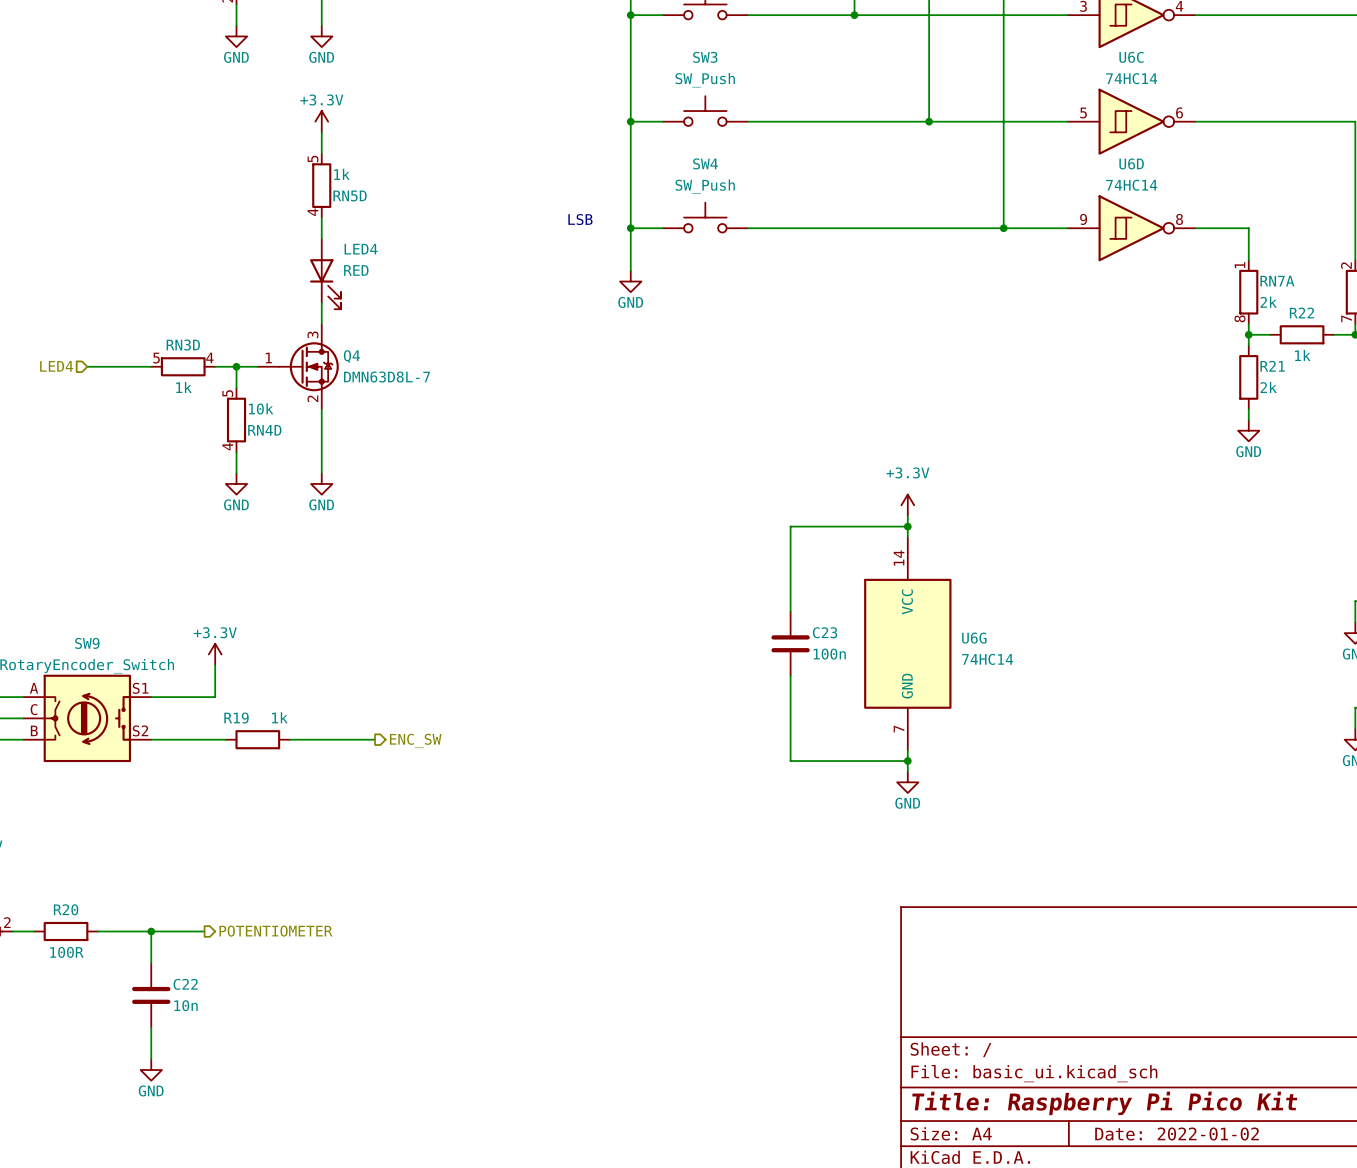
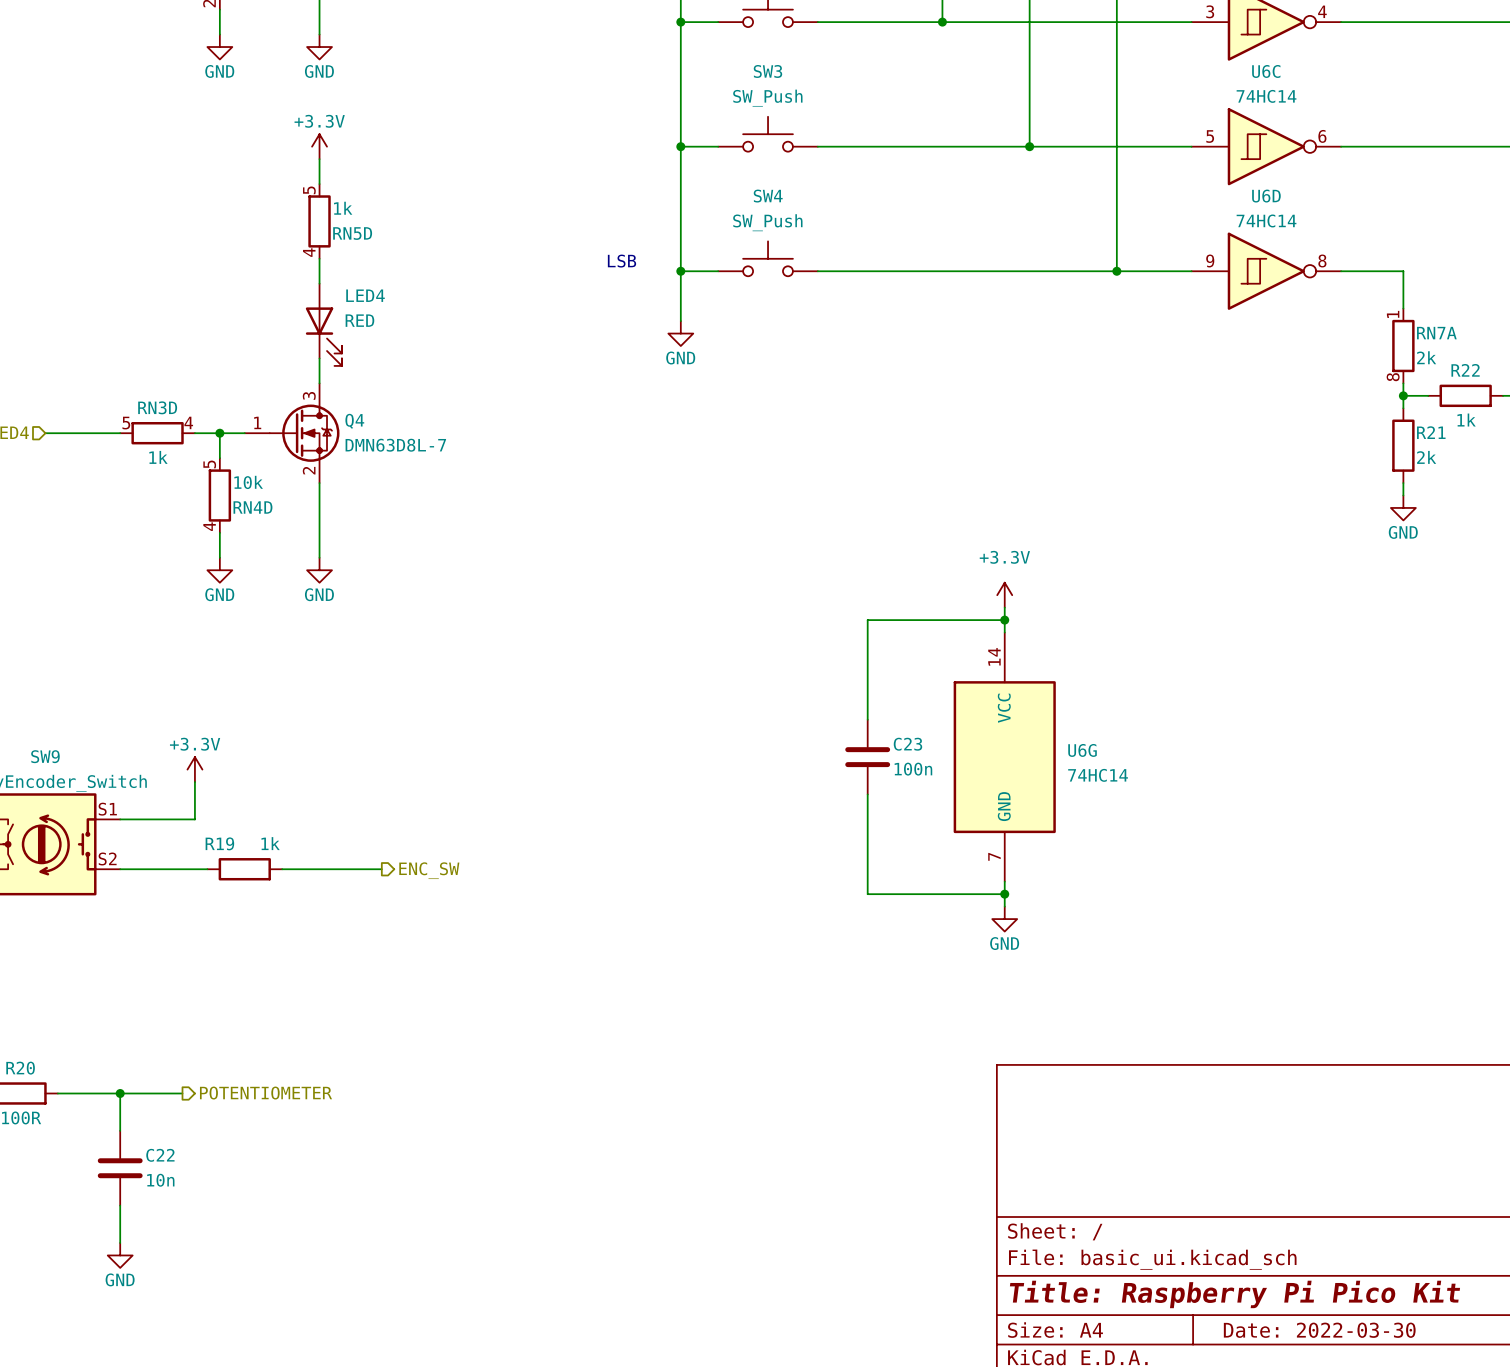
title block: Date: 2022-01-02 (1177, 1134) -> Date: 2022-03-30 (1319, 1330)

